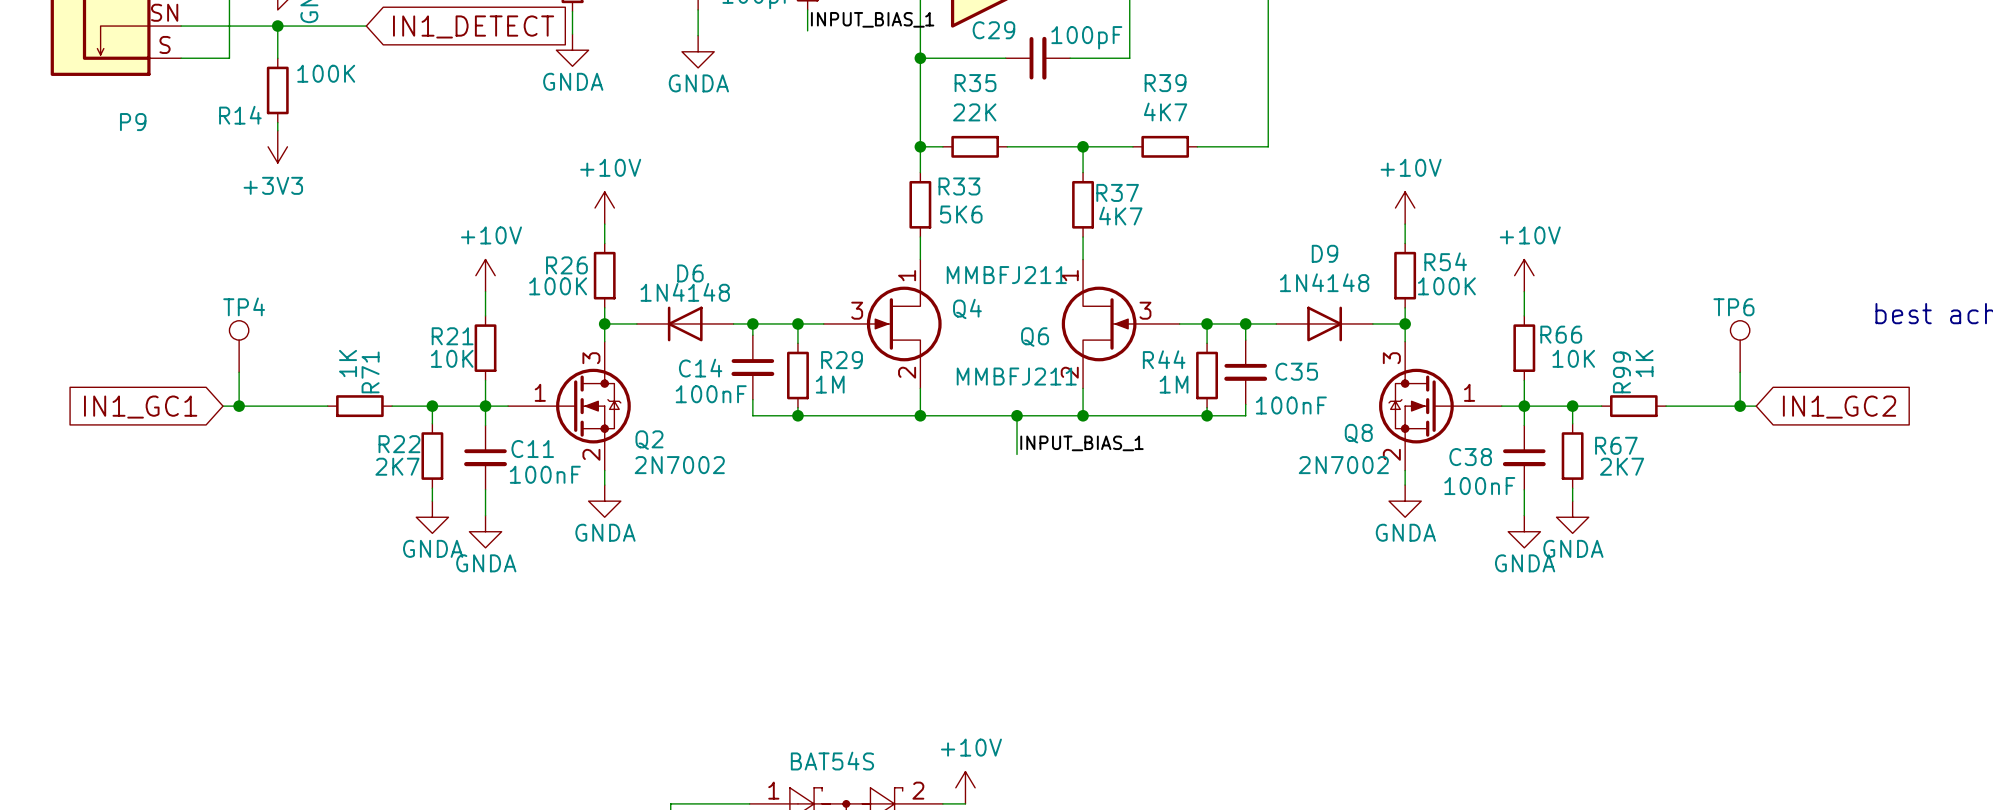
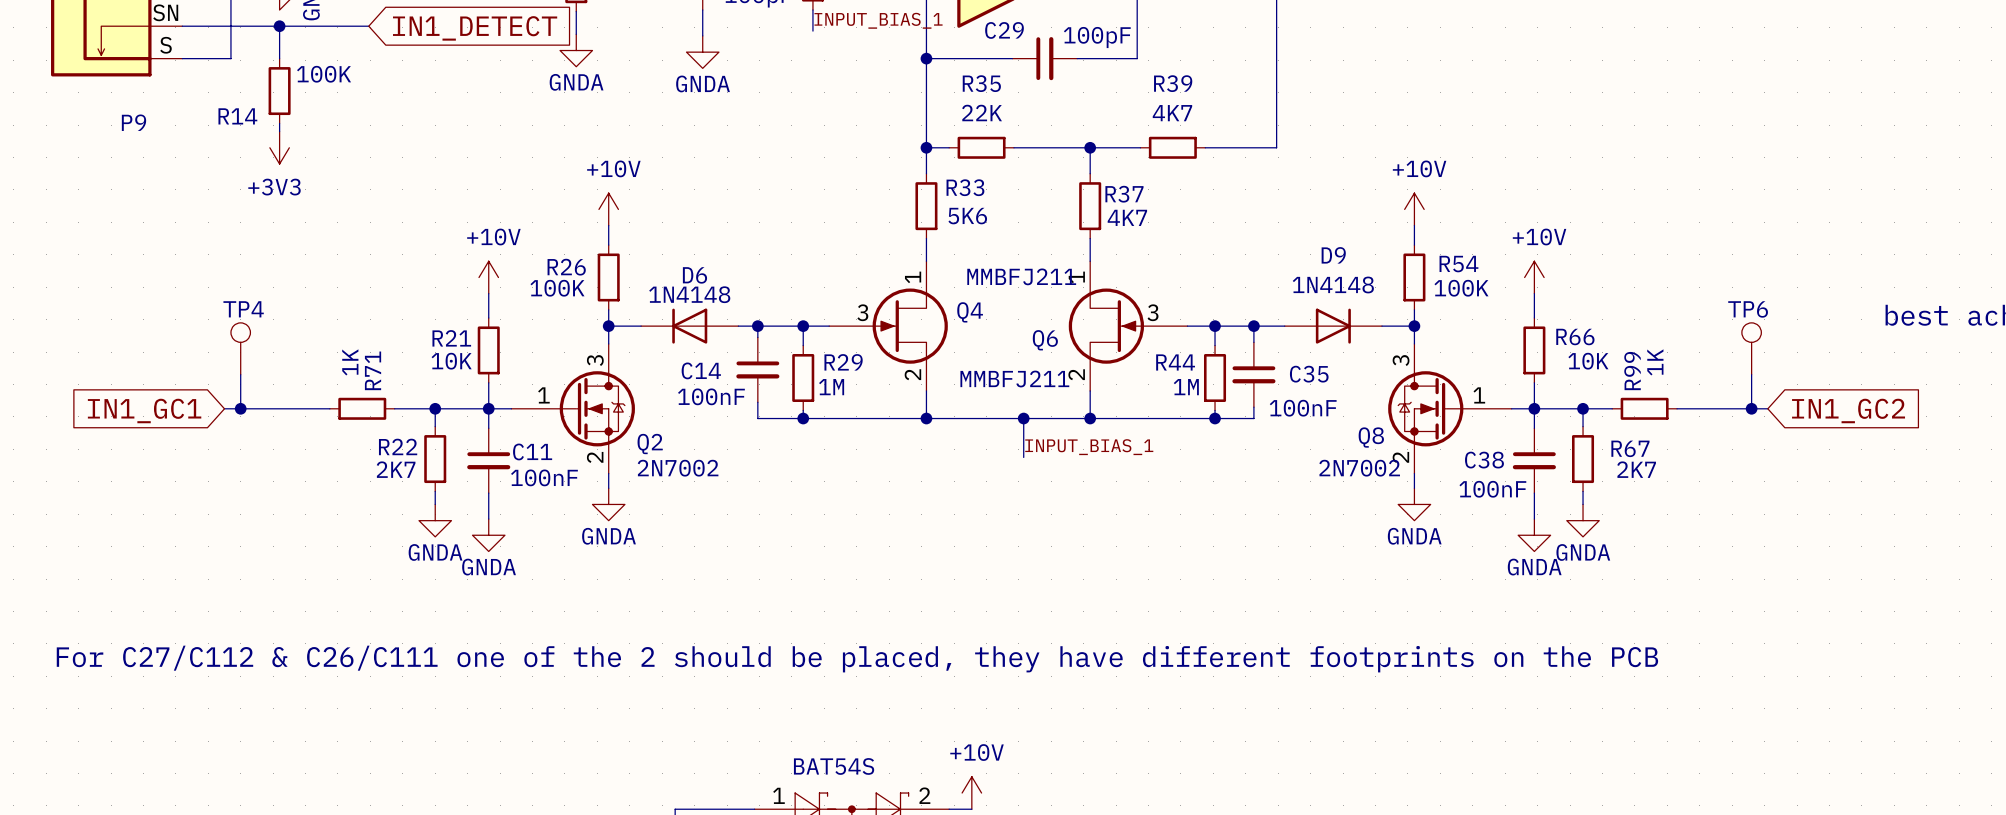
text: none -> For C27/C112 & C26/C111 one of the 2 should be placed, they have different footprints on the PCB (857, 659)

